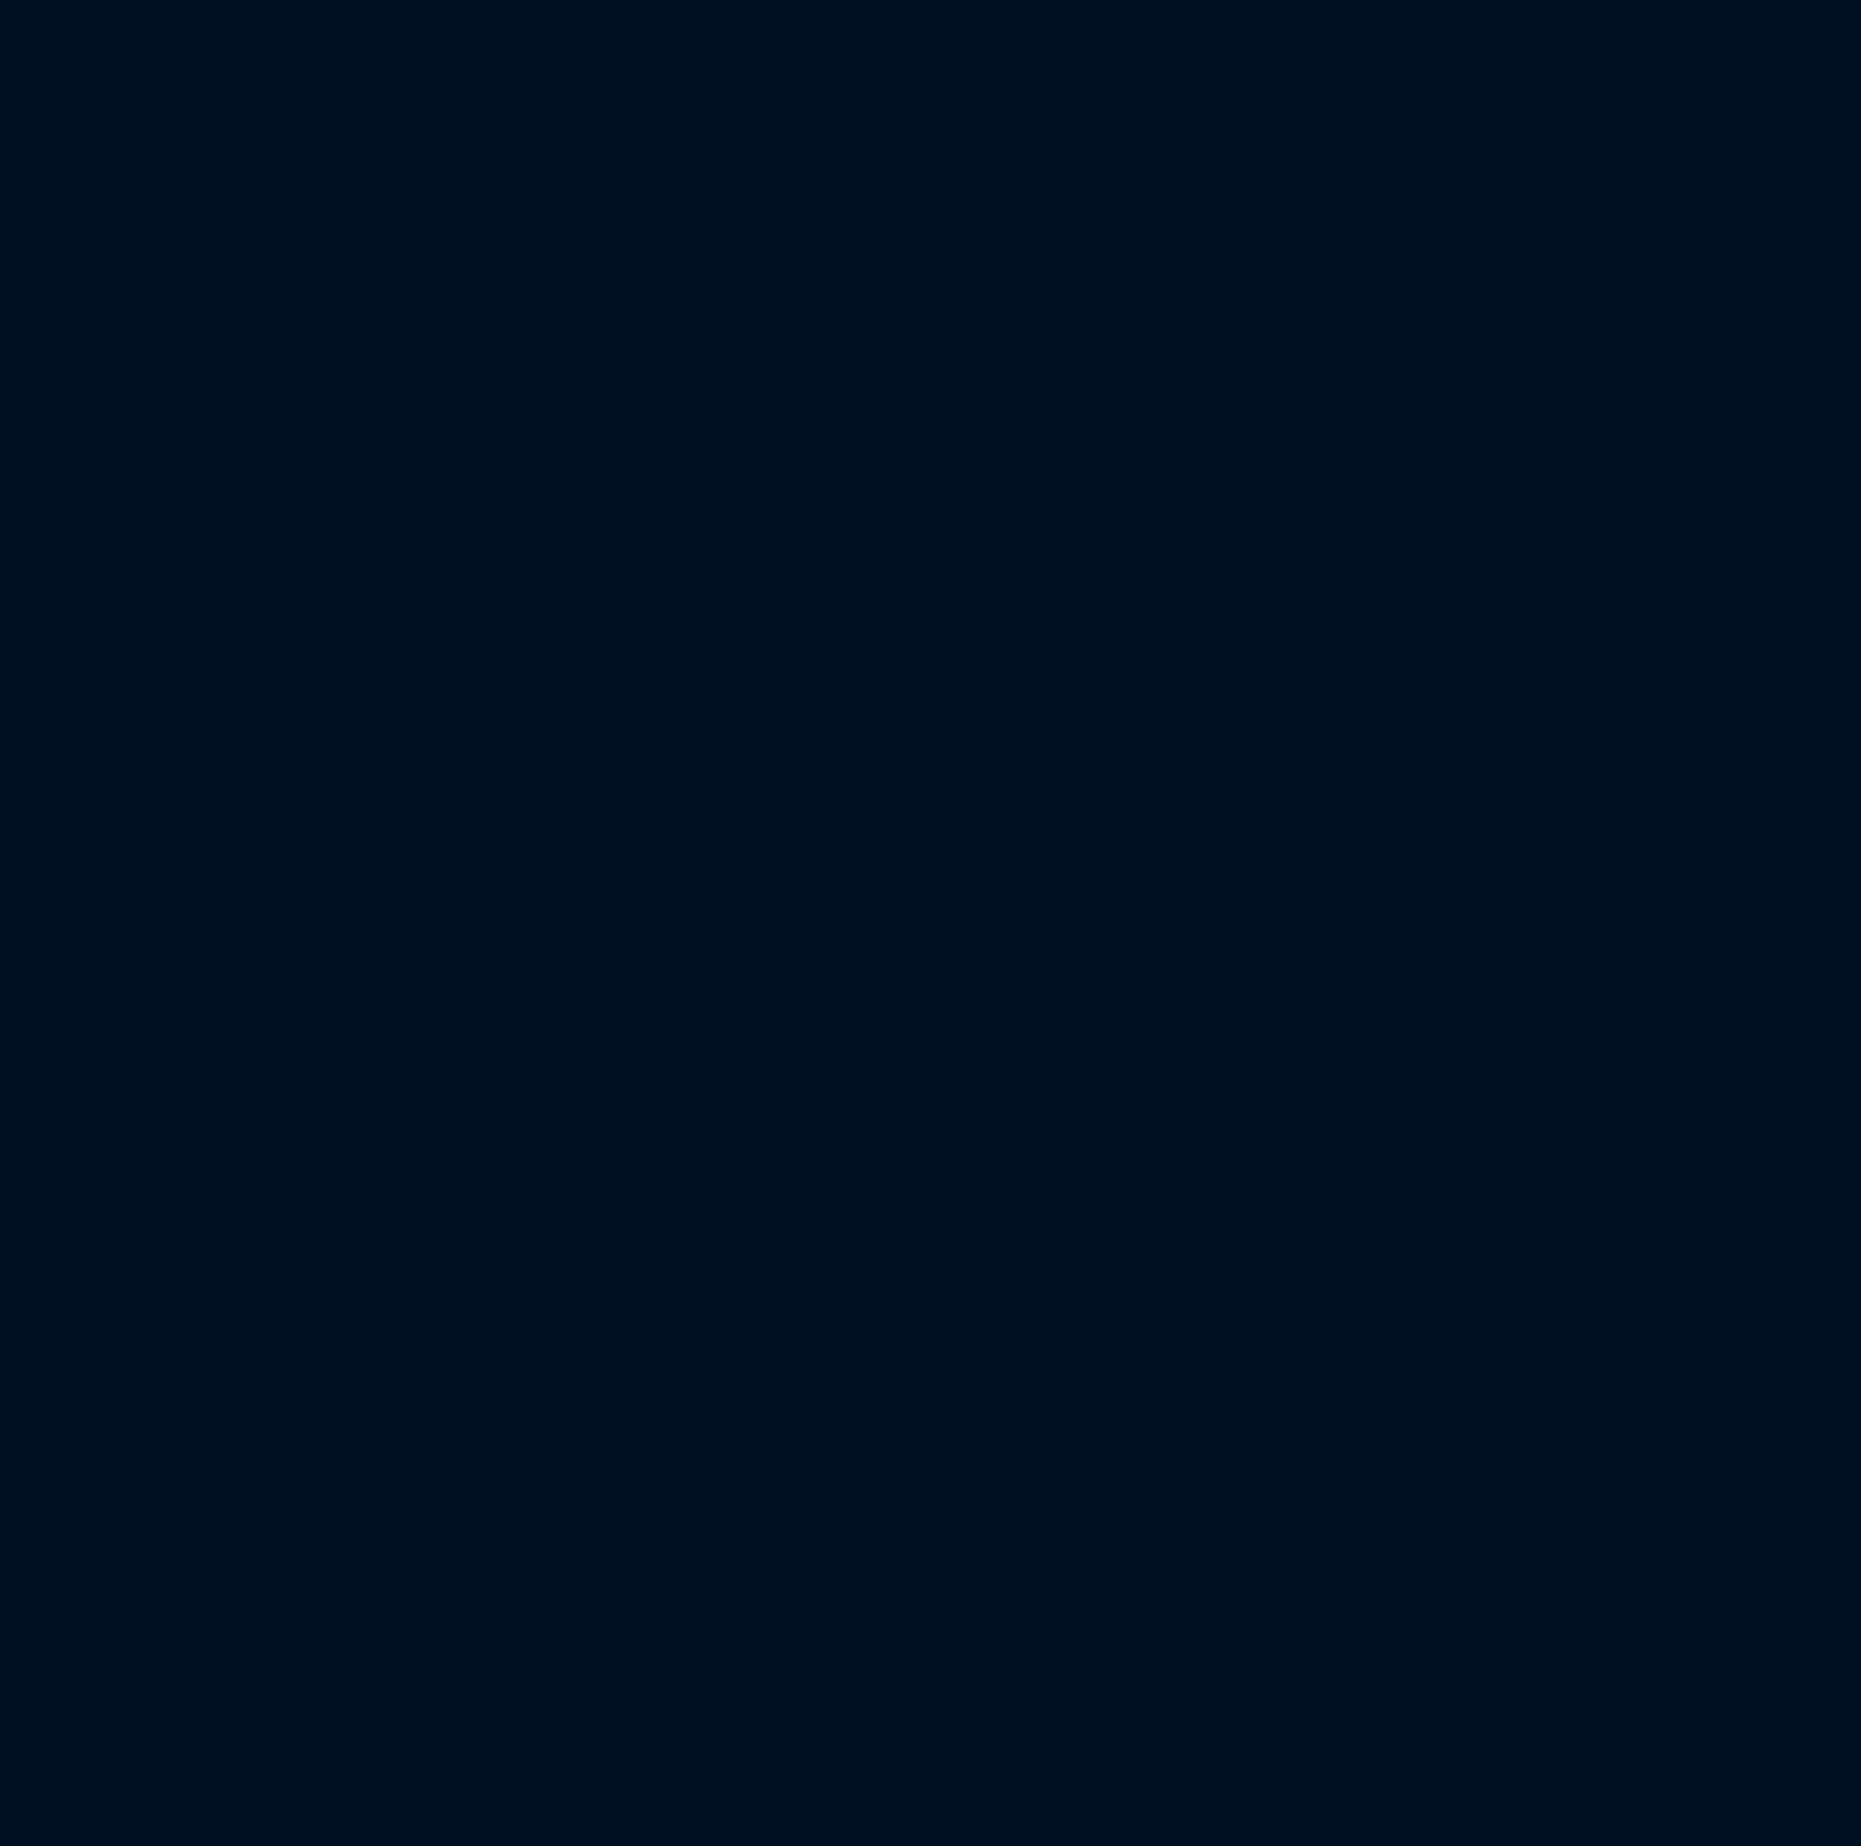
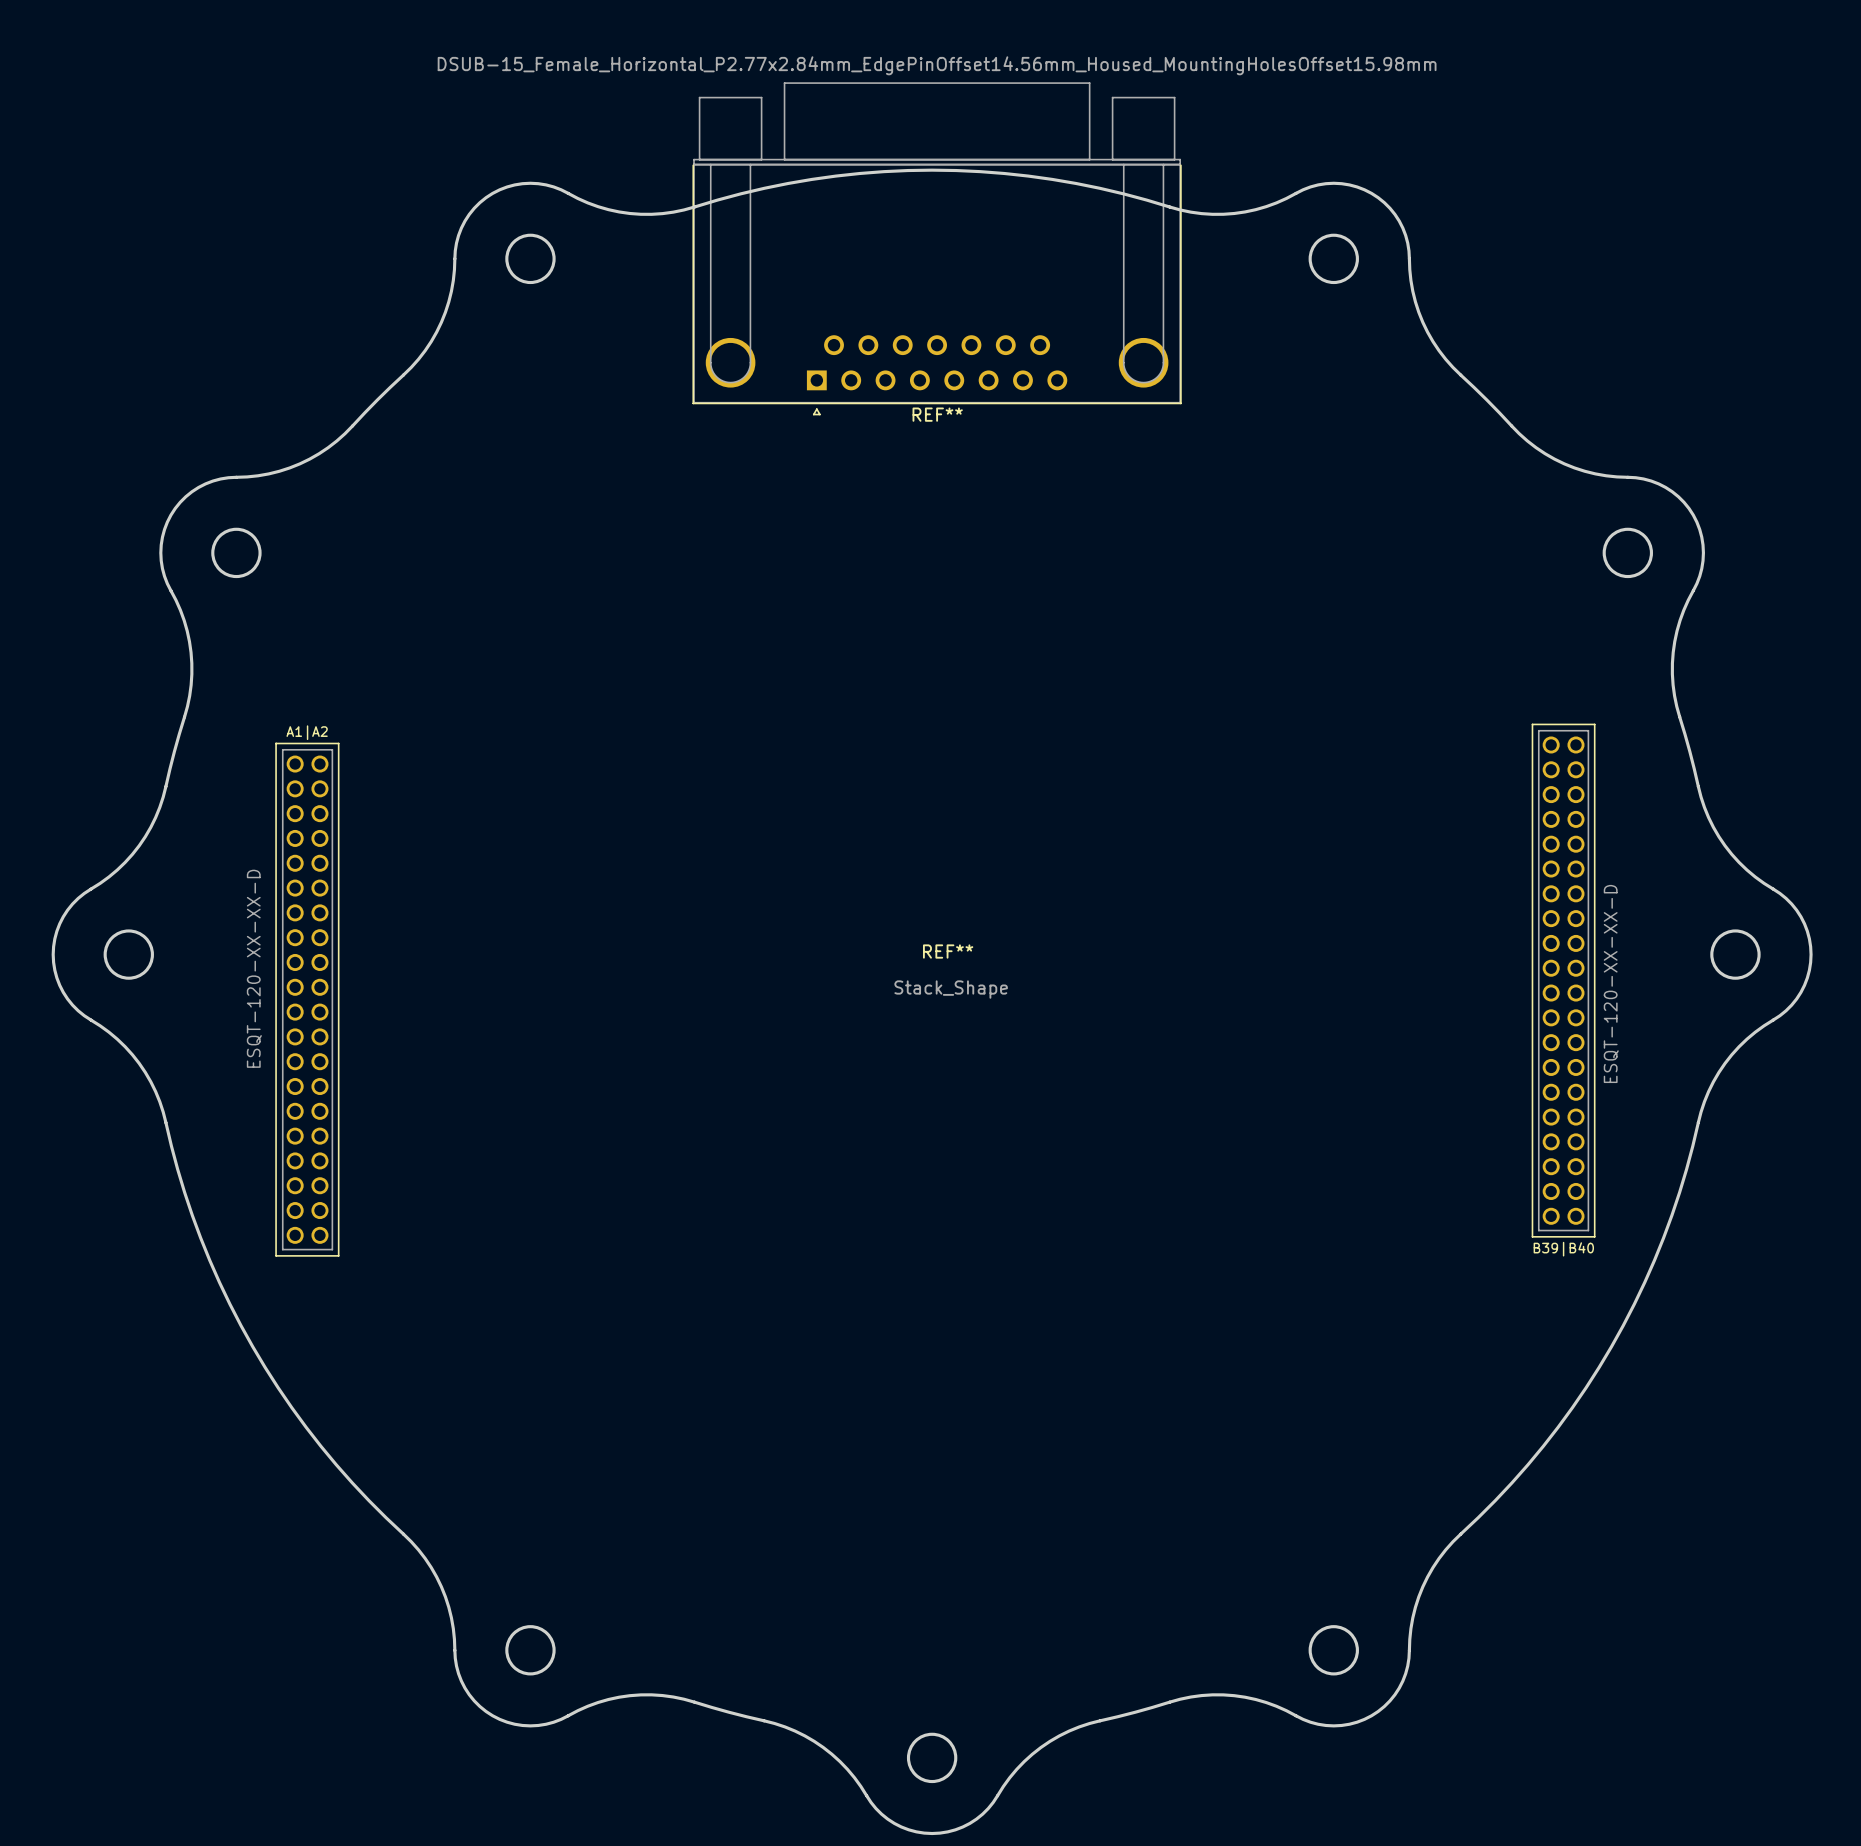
REF**: none -> DSUB-15_Female_Horizontal_P2.77x2.84mm_EdgePinOffset14.56mm_Housed_MountingHolesOffset15.98mm (937, 248)
REF**: none -> Stack_Shape (932, 1001)

